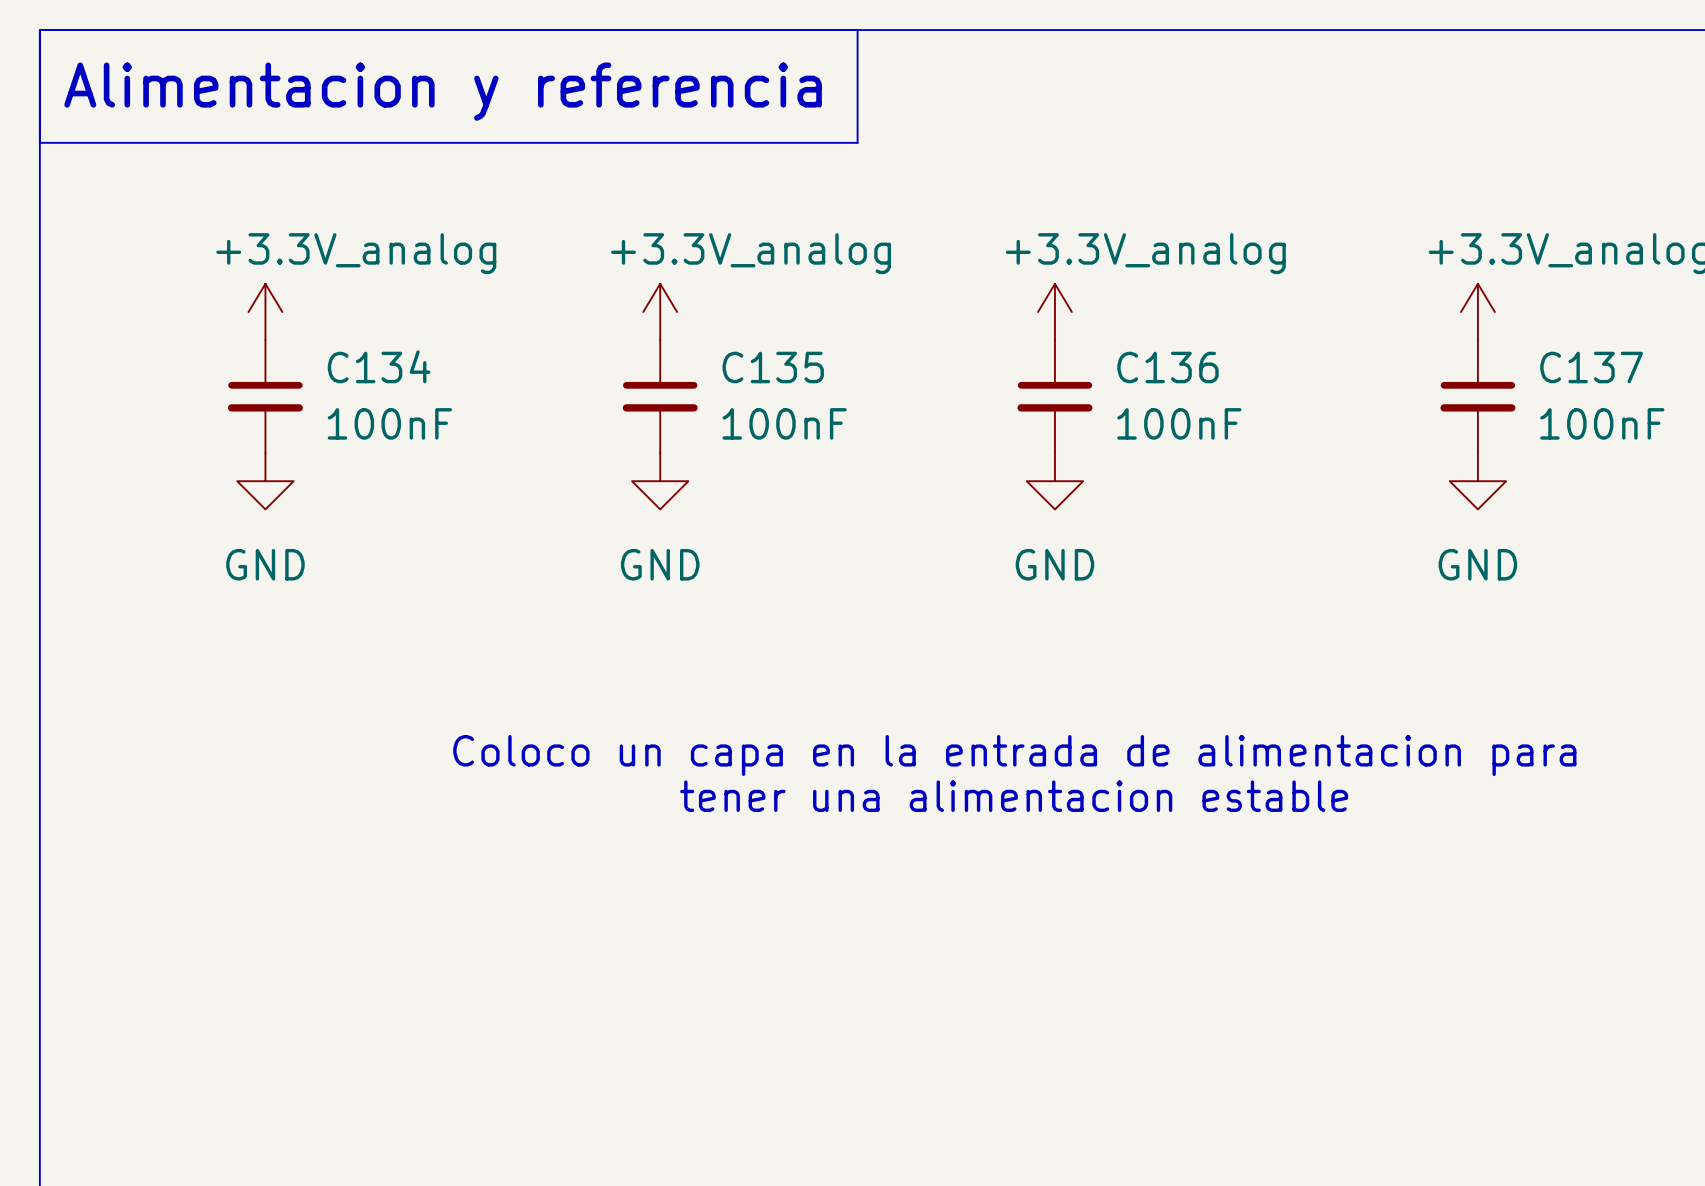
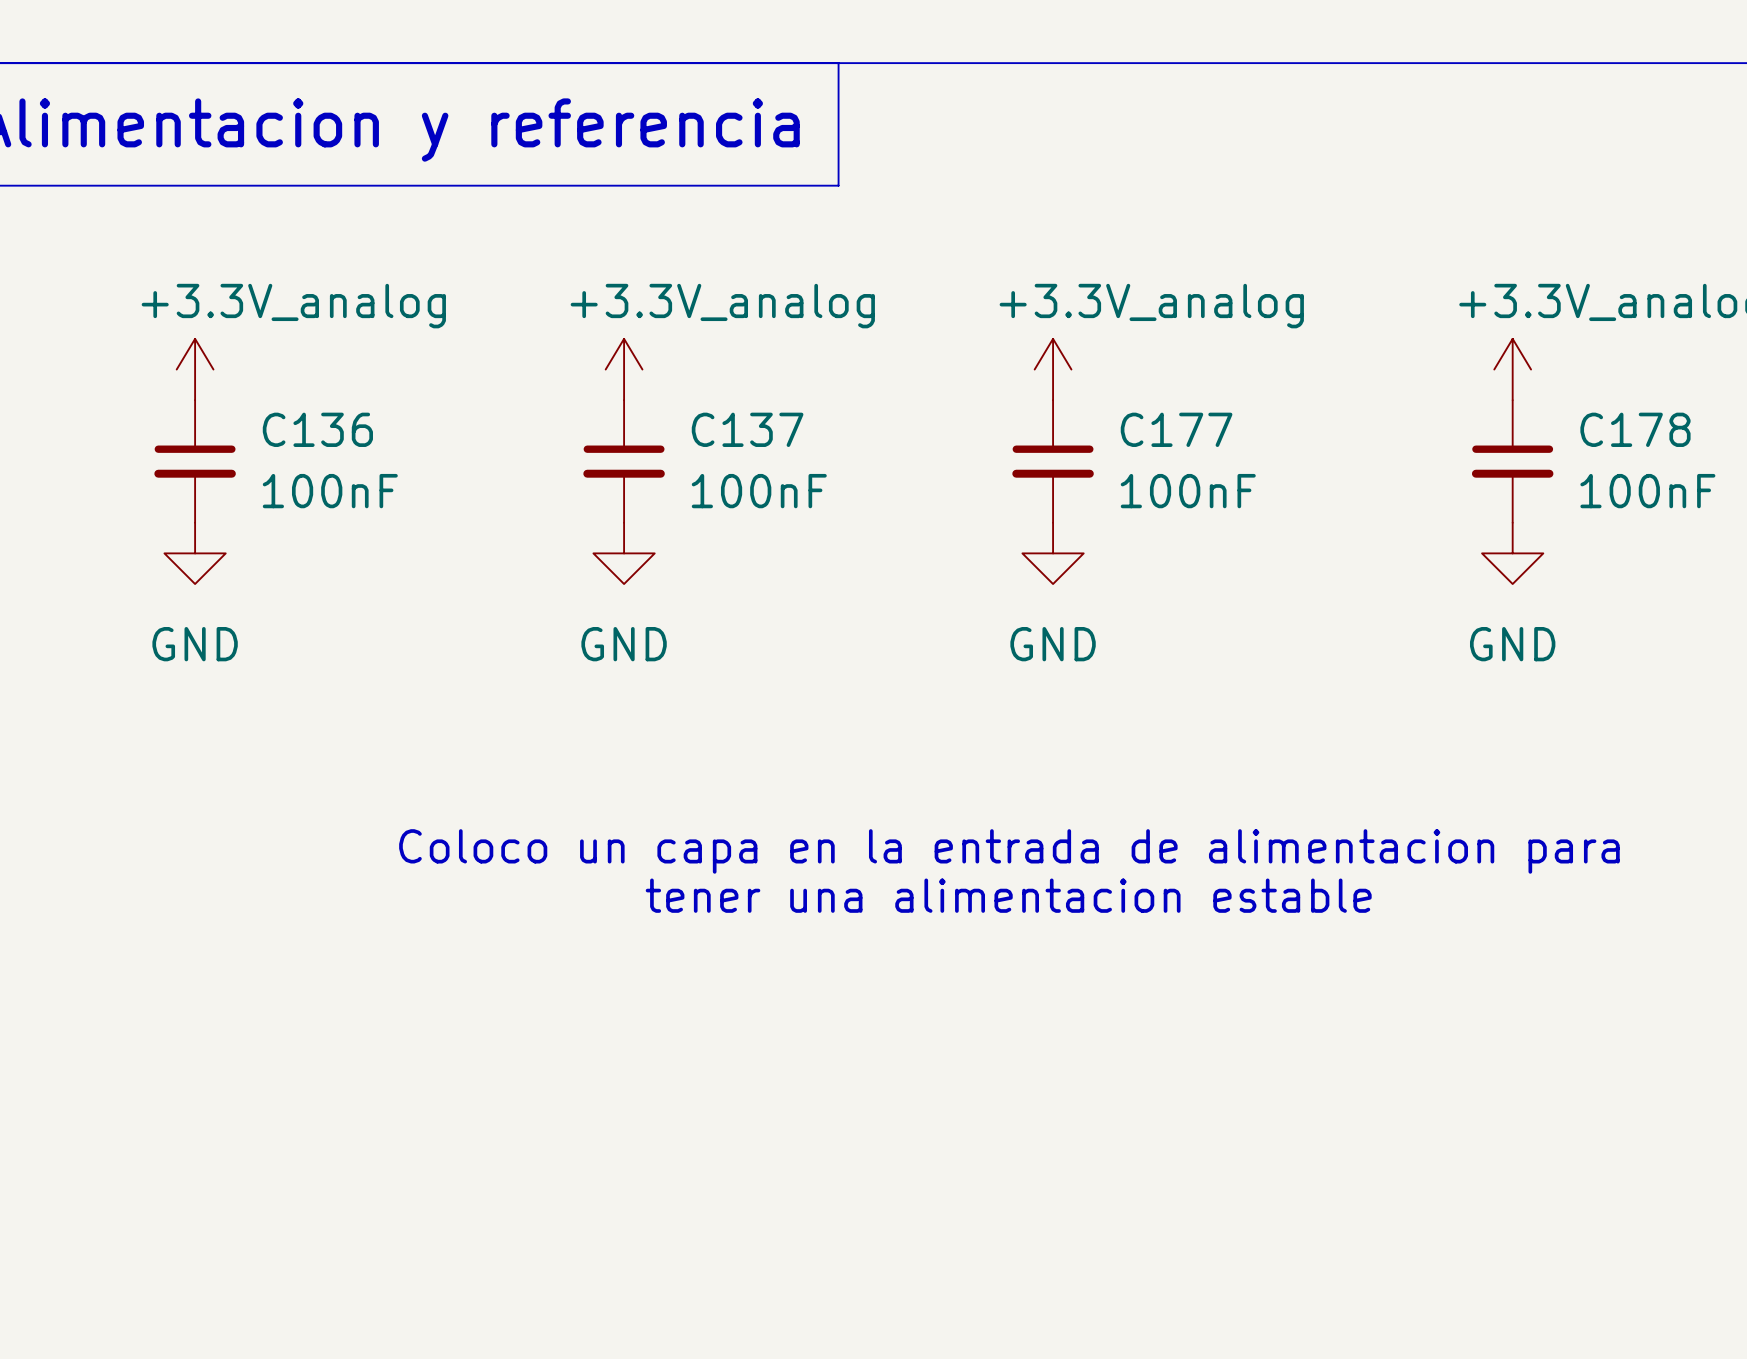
C134 name: C134 (379, 366) -> C136 (317, 429)
C135 name: C135 (773, 367) -> C137 (747, 429)
C136 name: C136 (1167, 367) -> C177 (1176, 429)
C137 name: C137 (1591, 367) -> C178 (1635, 429)

